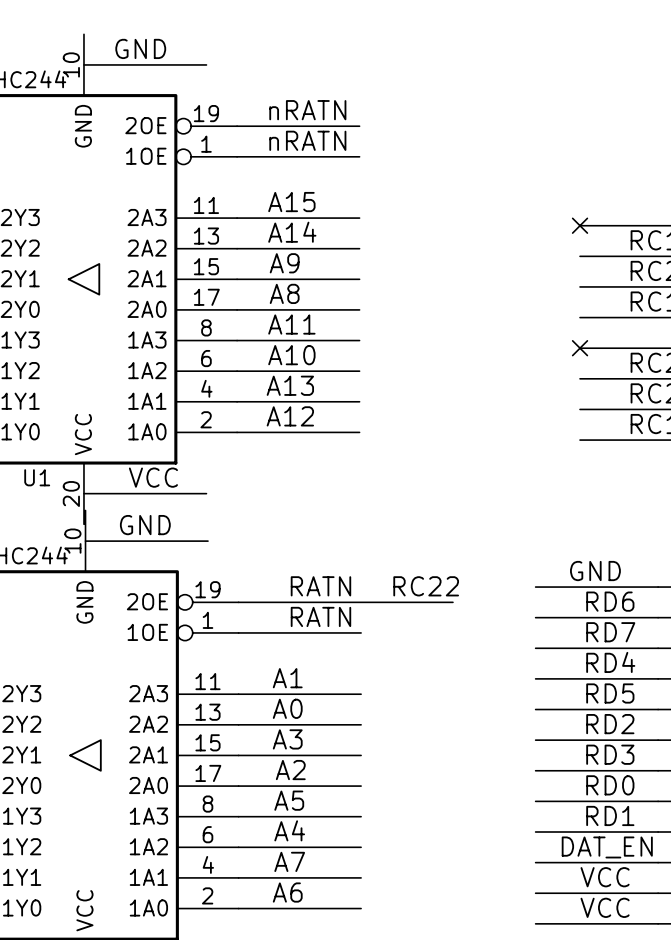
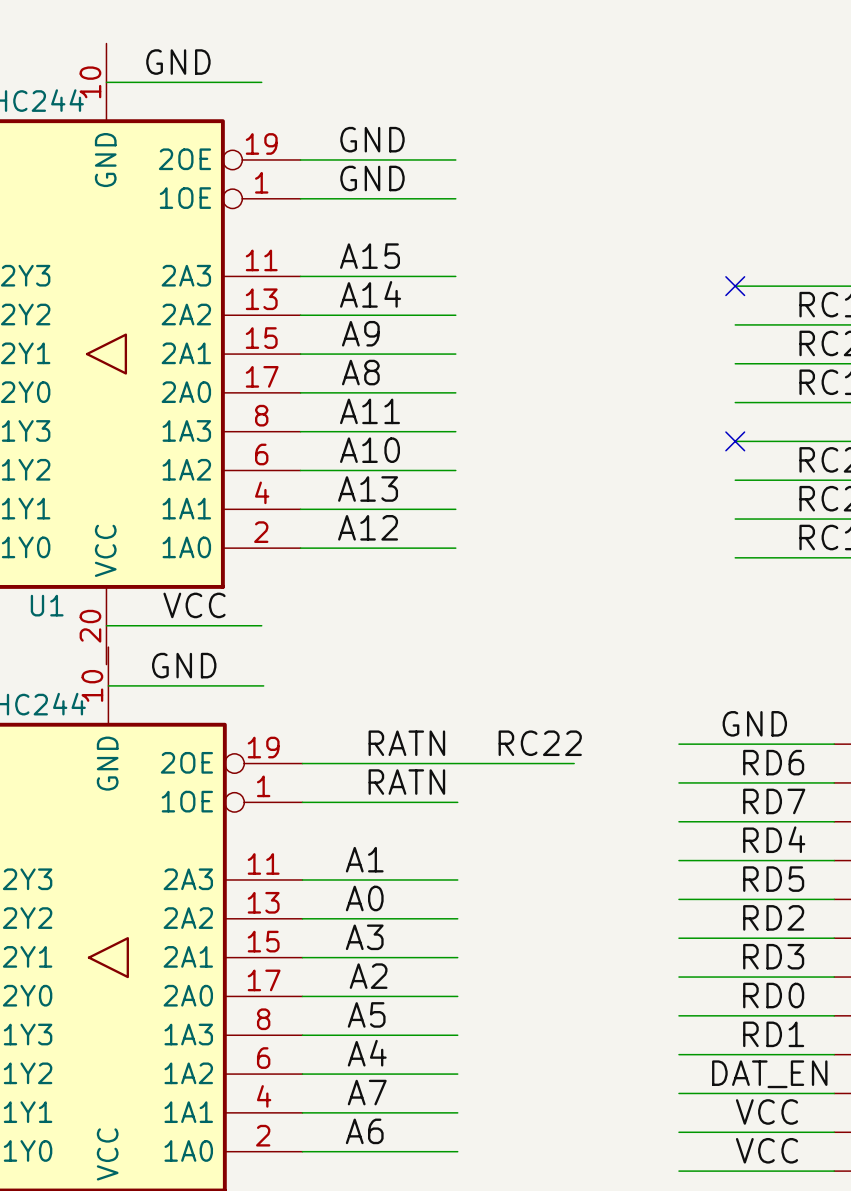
label: nRATN (307, 110) -> GND (372, 139)
label: nRATN (307, 140) -> GND (372, 178)

